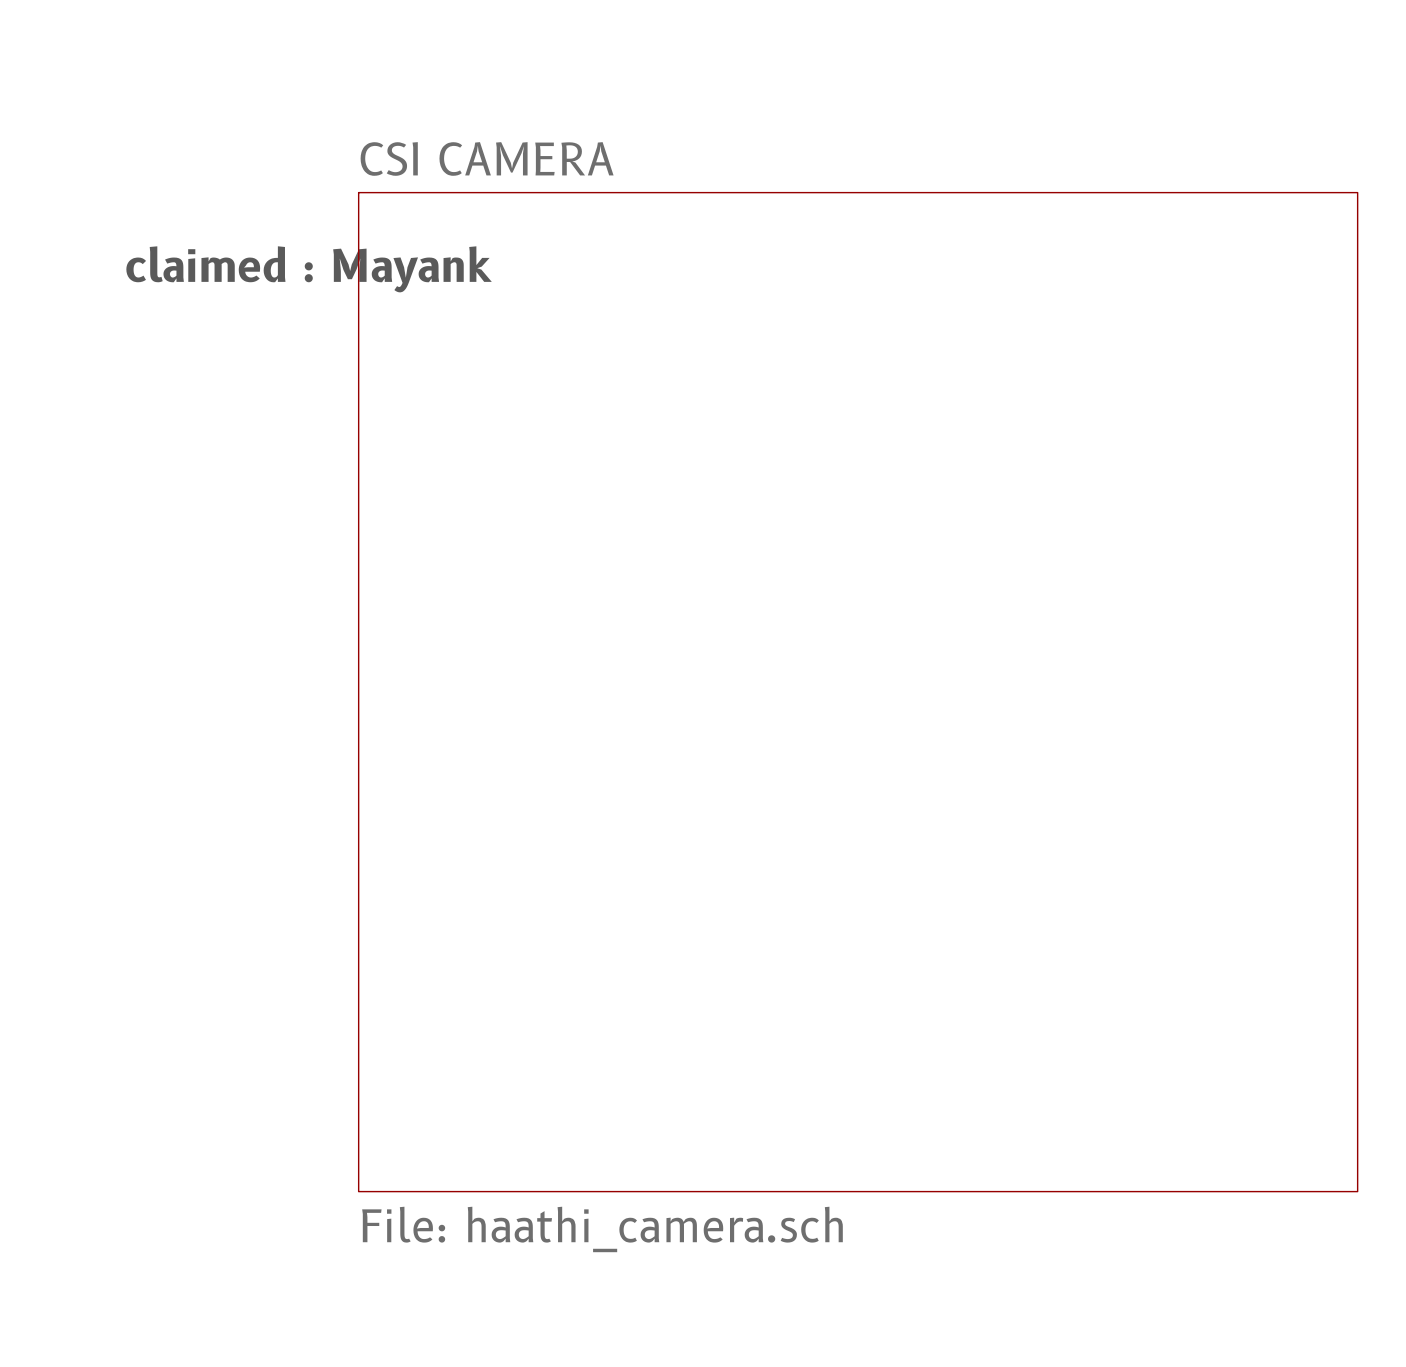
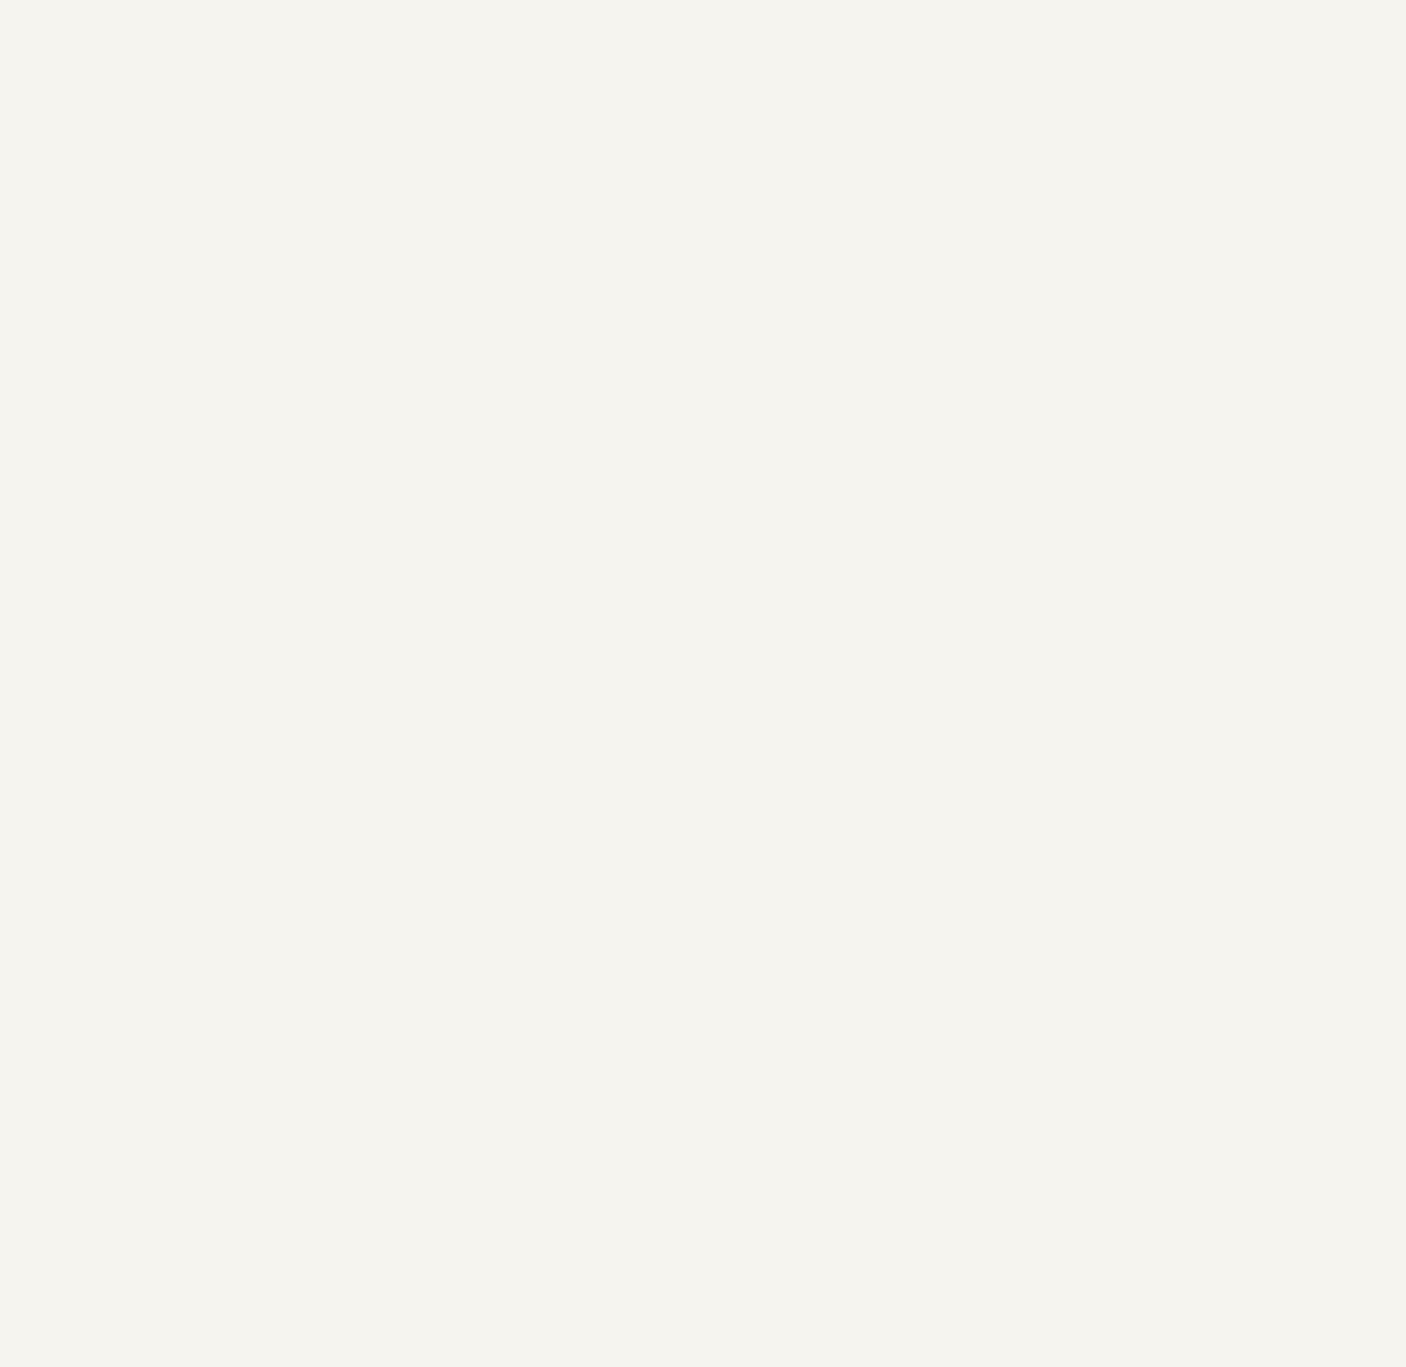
text: claimed : Mayank (309, 269) -> none
sheet CSI CAMERA: File: haathi_camera.sch (858, 692) -> none

